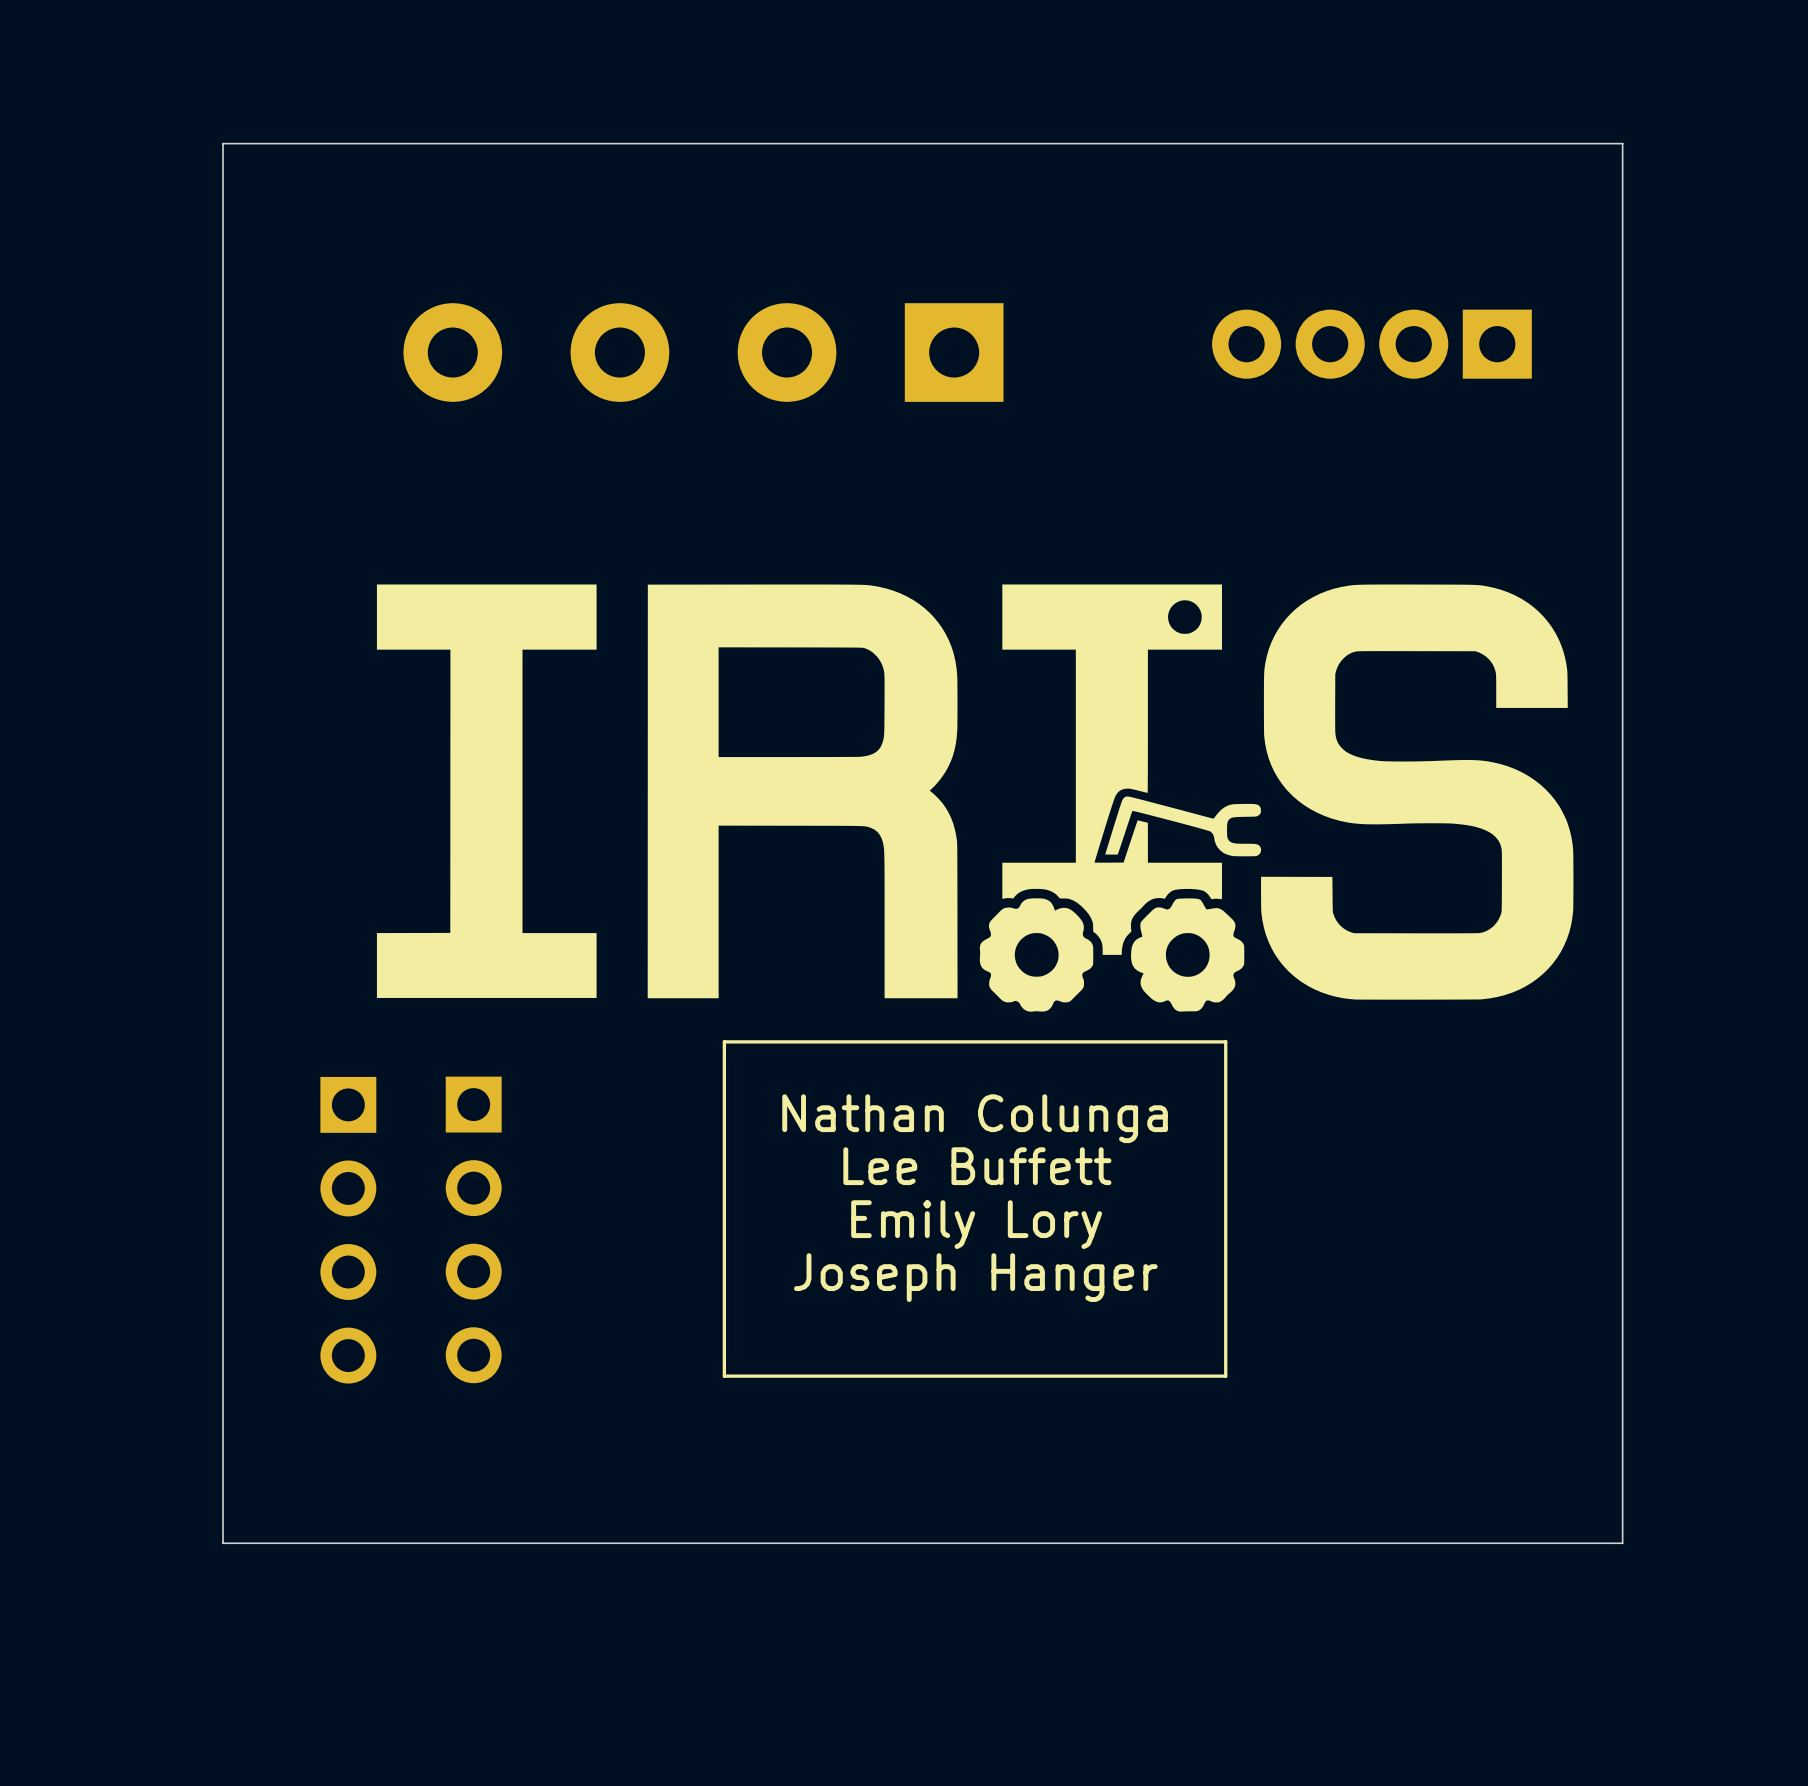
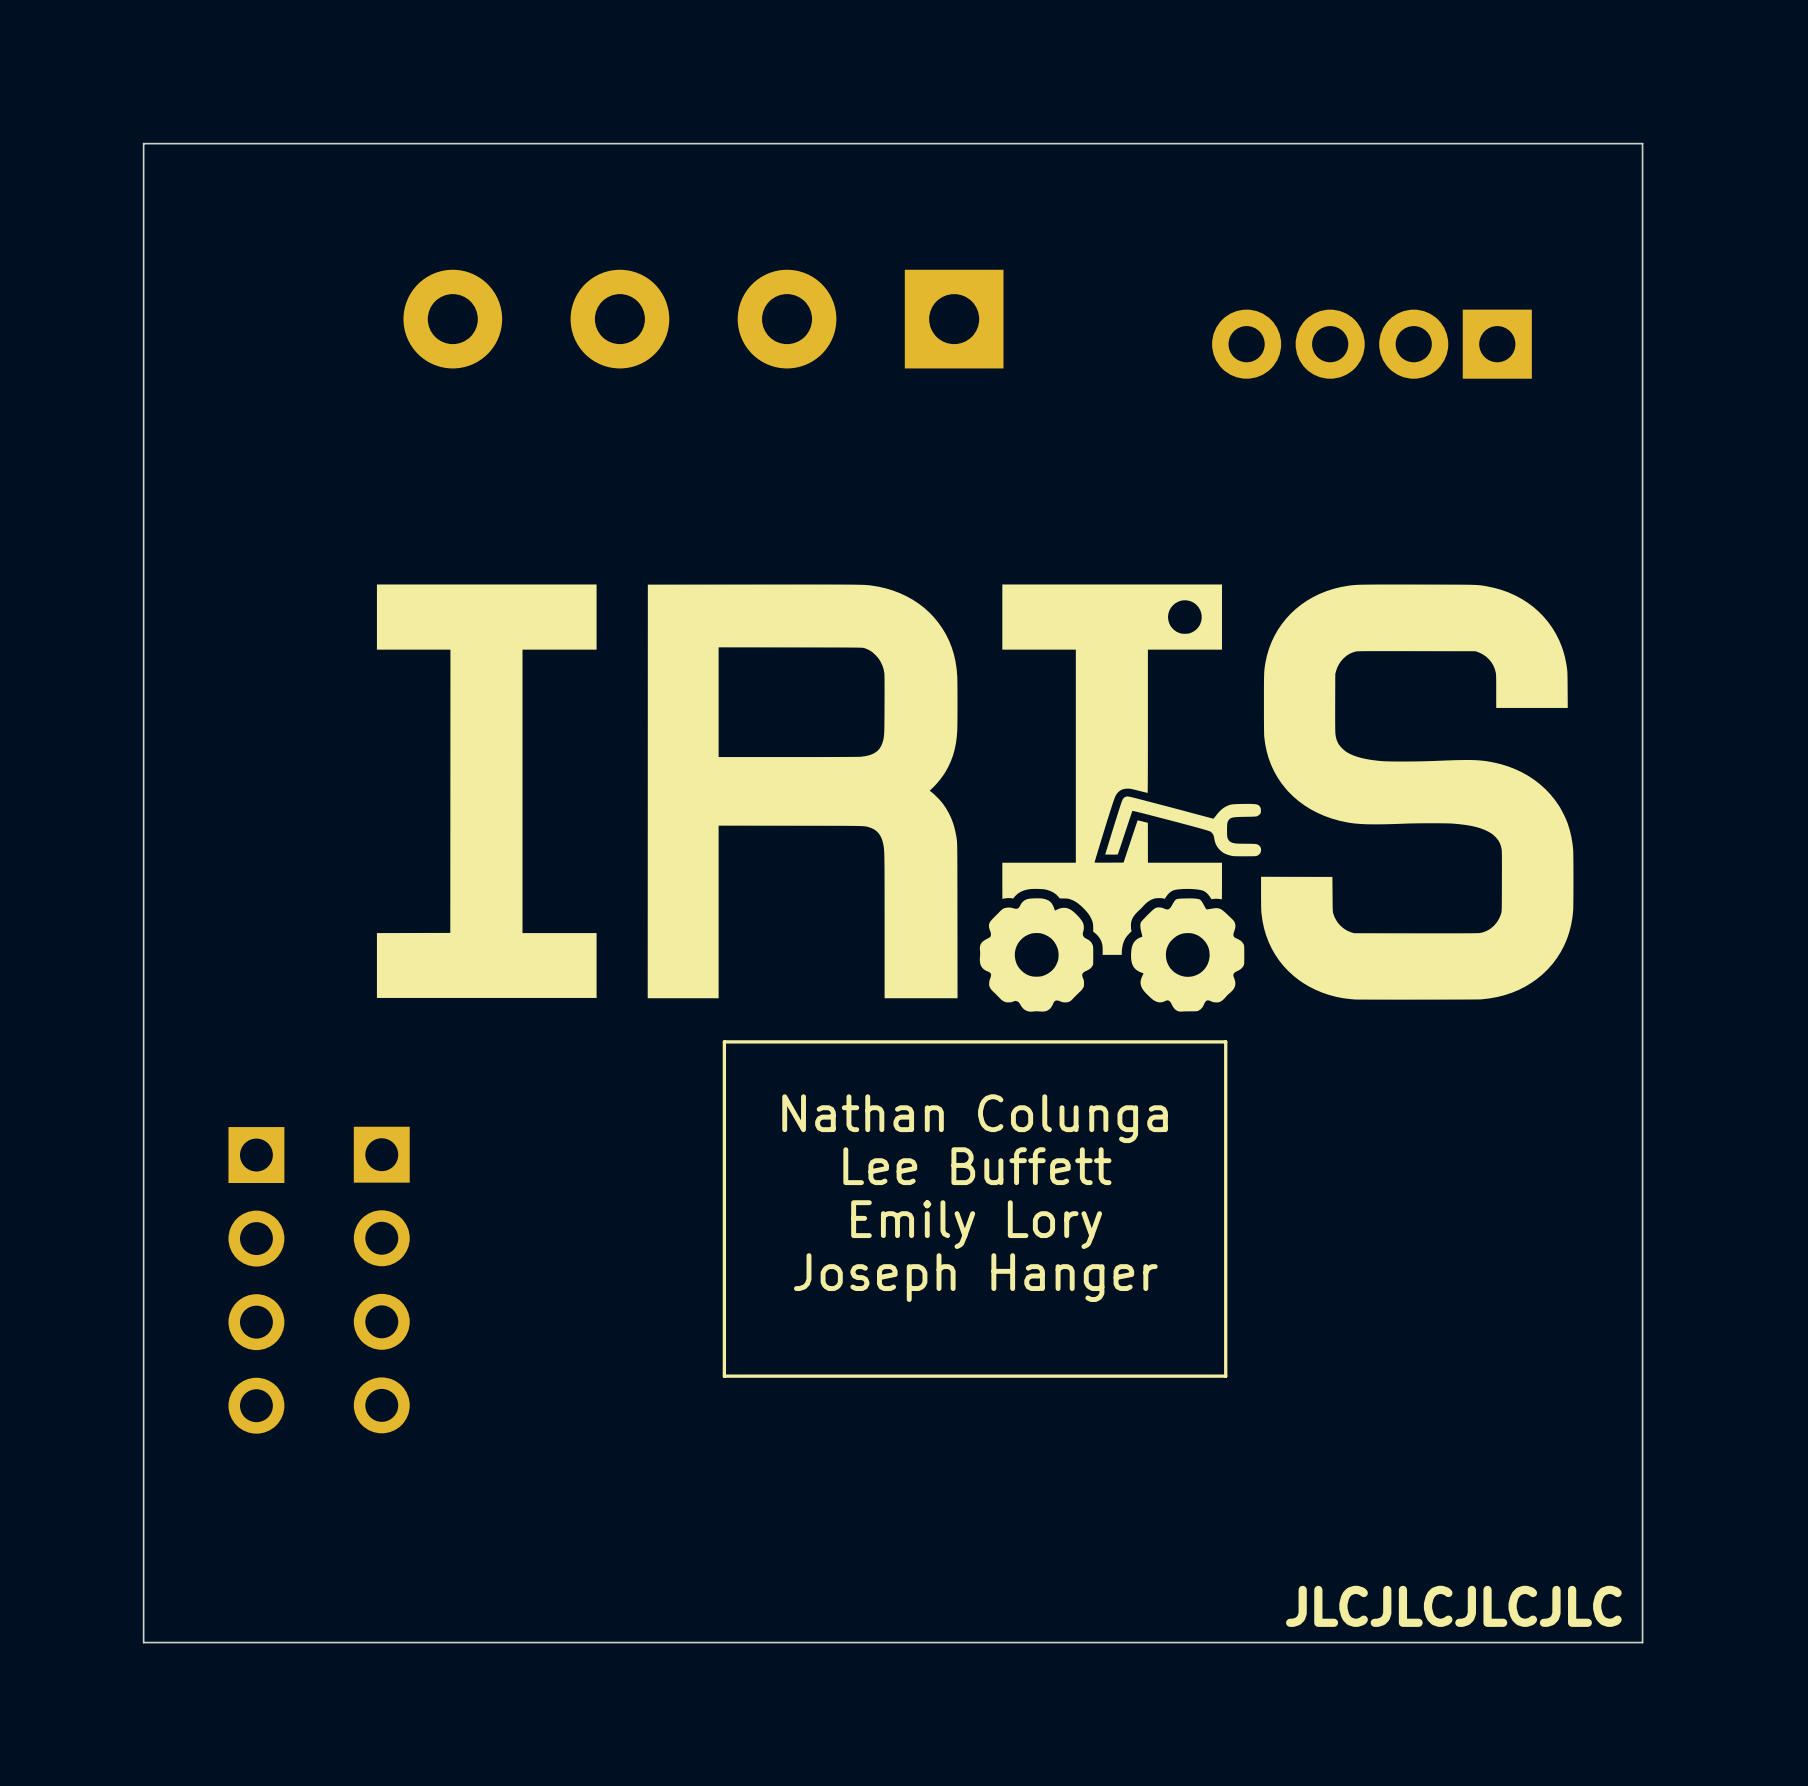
board edge: (1622, 143) (1622, 1543) (223, 1543) (223, 143) -> (1622, 143) (1642, 143) (1642, 1642) (143, 1642) (143, 143) (223, 143)
part position: (703, 352) -> (703, 319)
part: (473, 1229) -> none
part: (348, 1230) -> none
part: none -> (256, 1280)
part: none -> (381, 1280)
text: none -> JLCJLCJLCJLC (1453, 1606)

